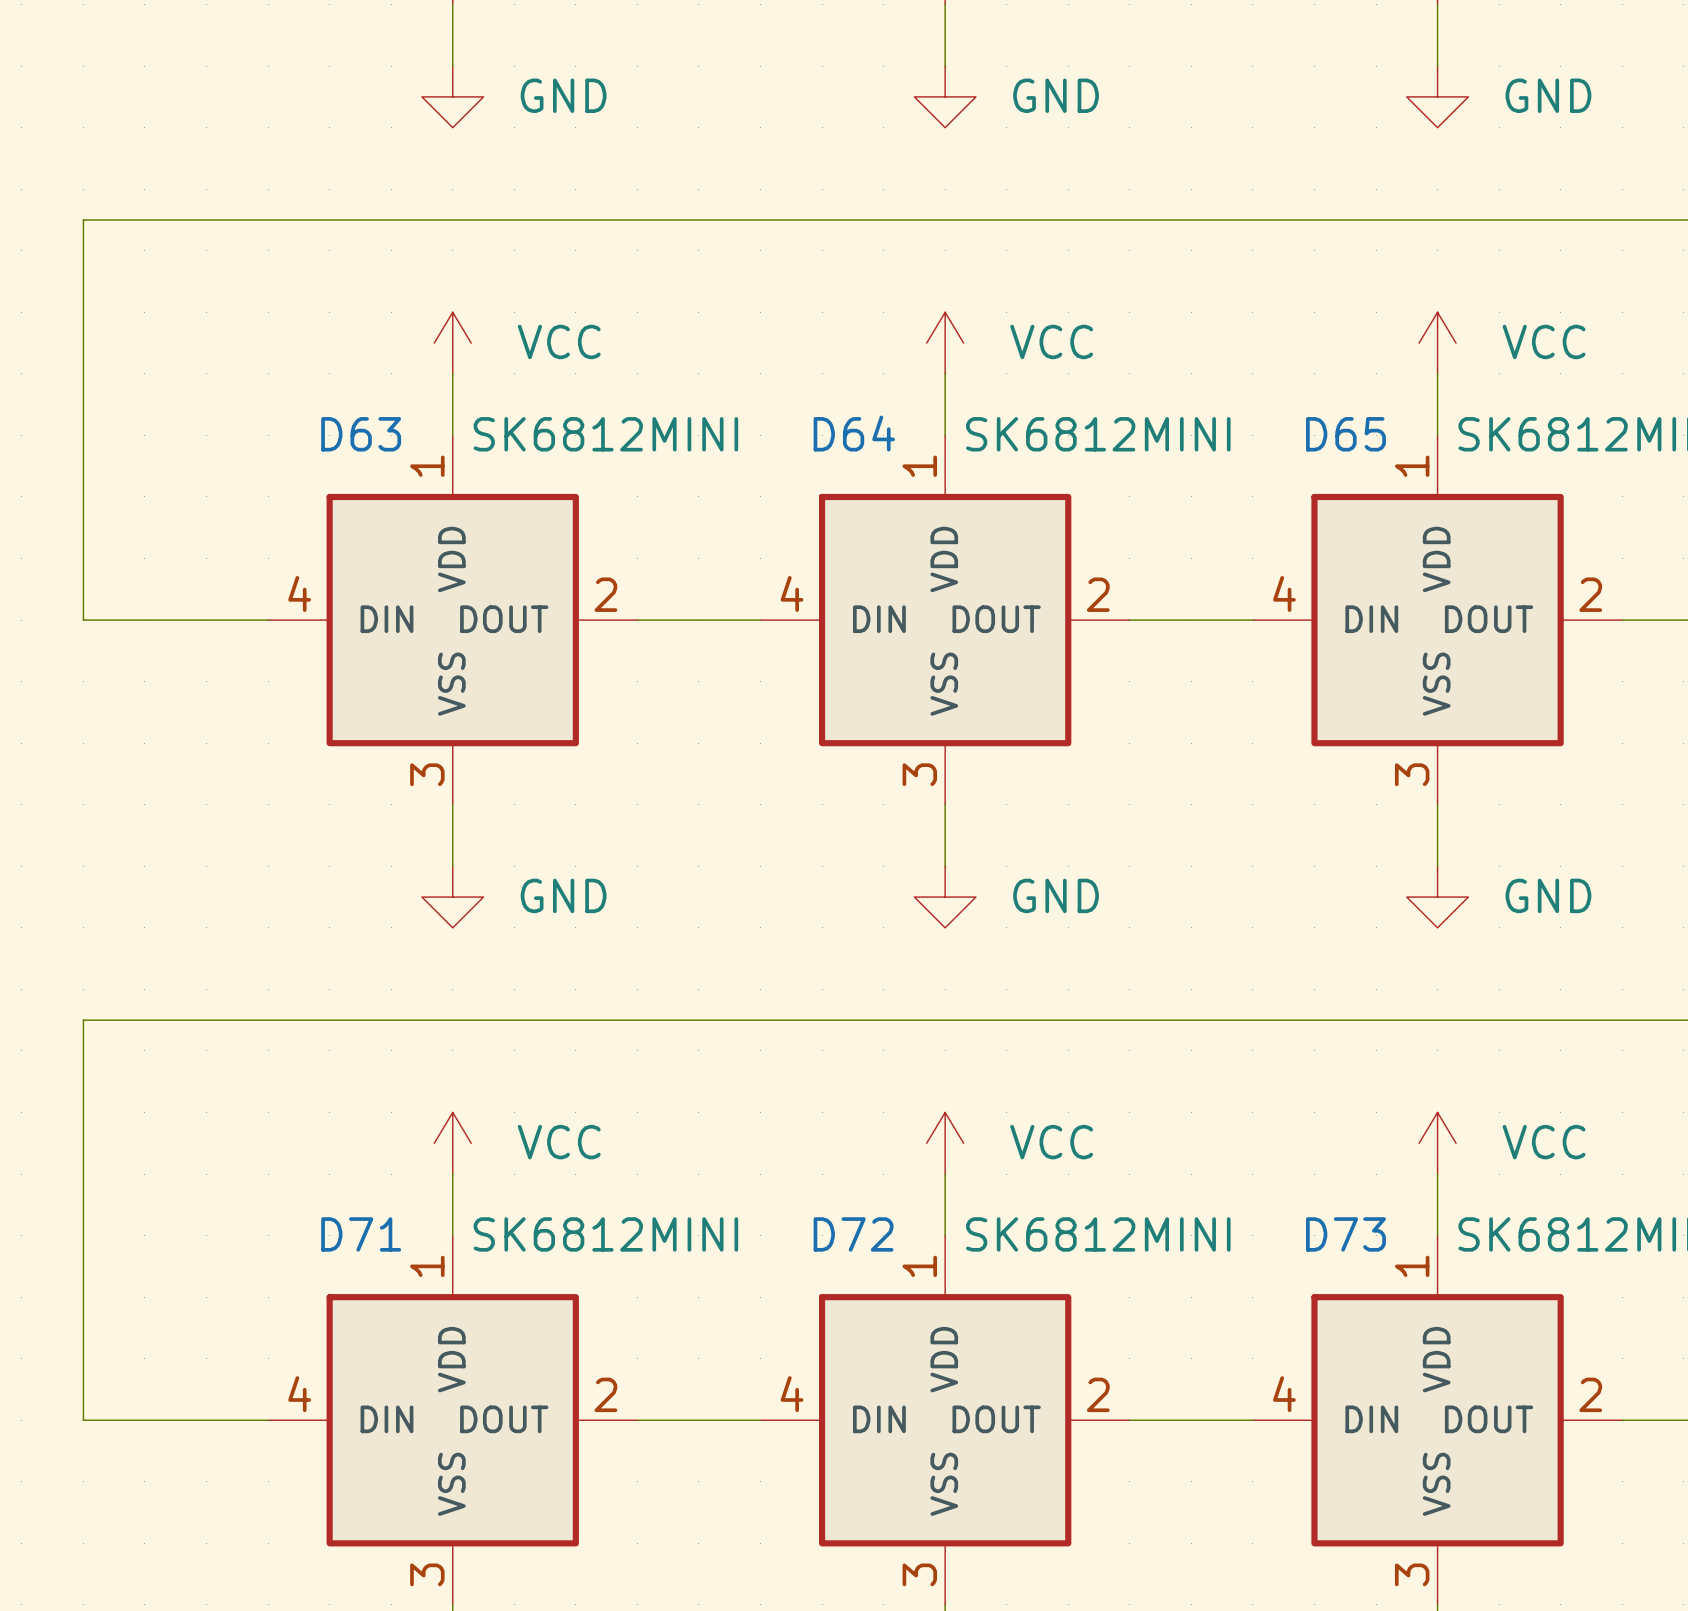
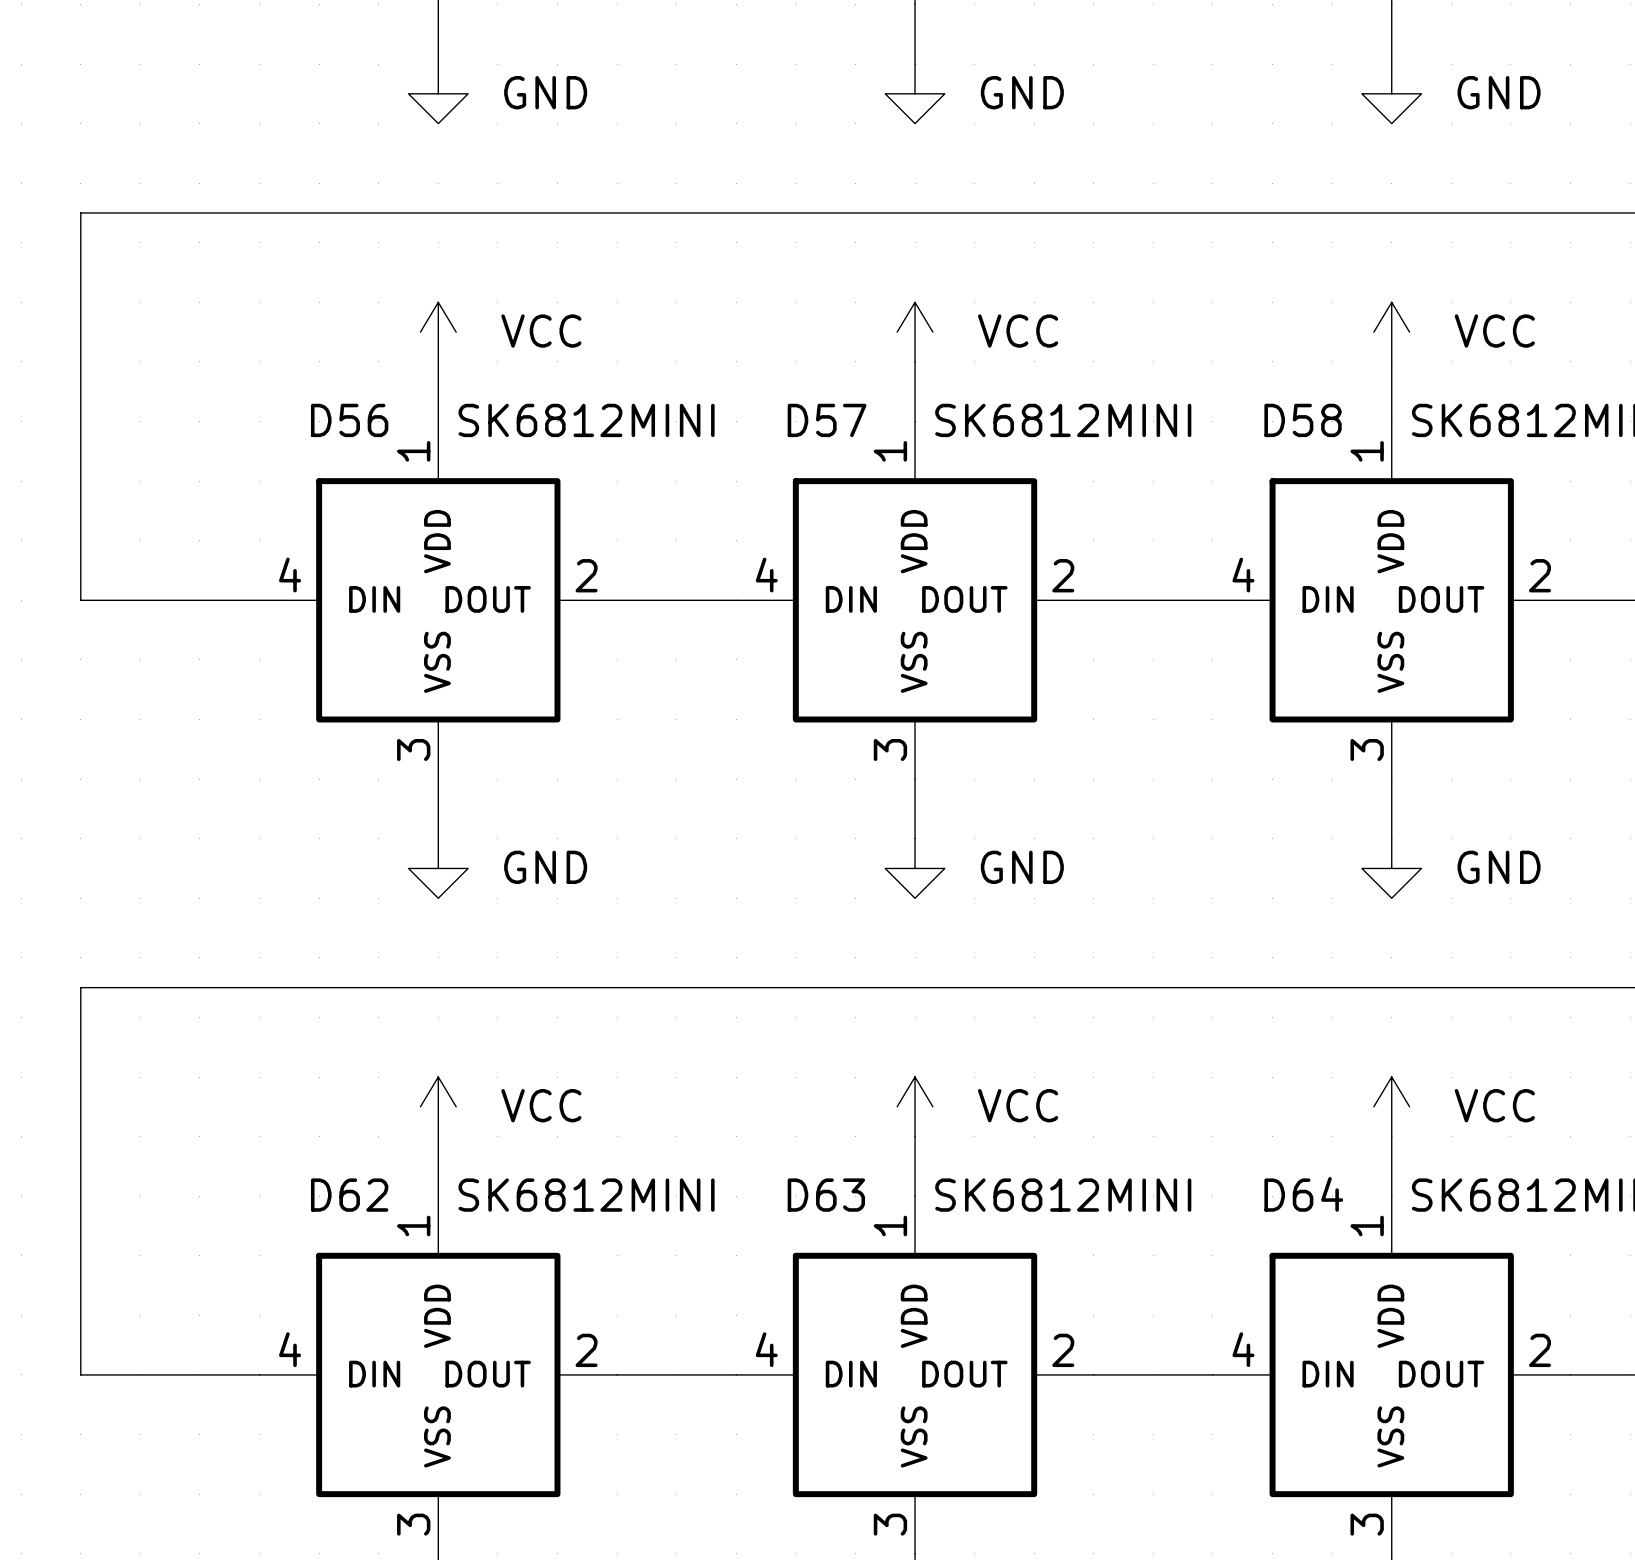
D64 name: D64 (854, 433) -> D57 (827, 420)
D63 name: D63 (361, 434) -> D56 (349, 420)
D65 name: D65 (1345, 434) -> D58 (1303, 420)
D71 name: D71 (361, 1234) -> D62 (349, 1195)
D72 name: D72 (853, 1234) -> D63 (826, 1195)
D73 name: D73 (1345, 1234) -> D64 (1303, 1194)

